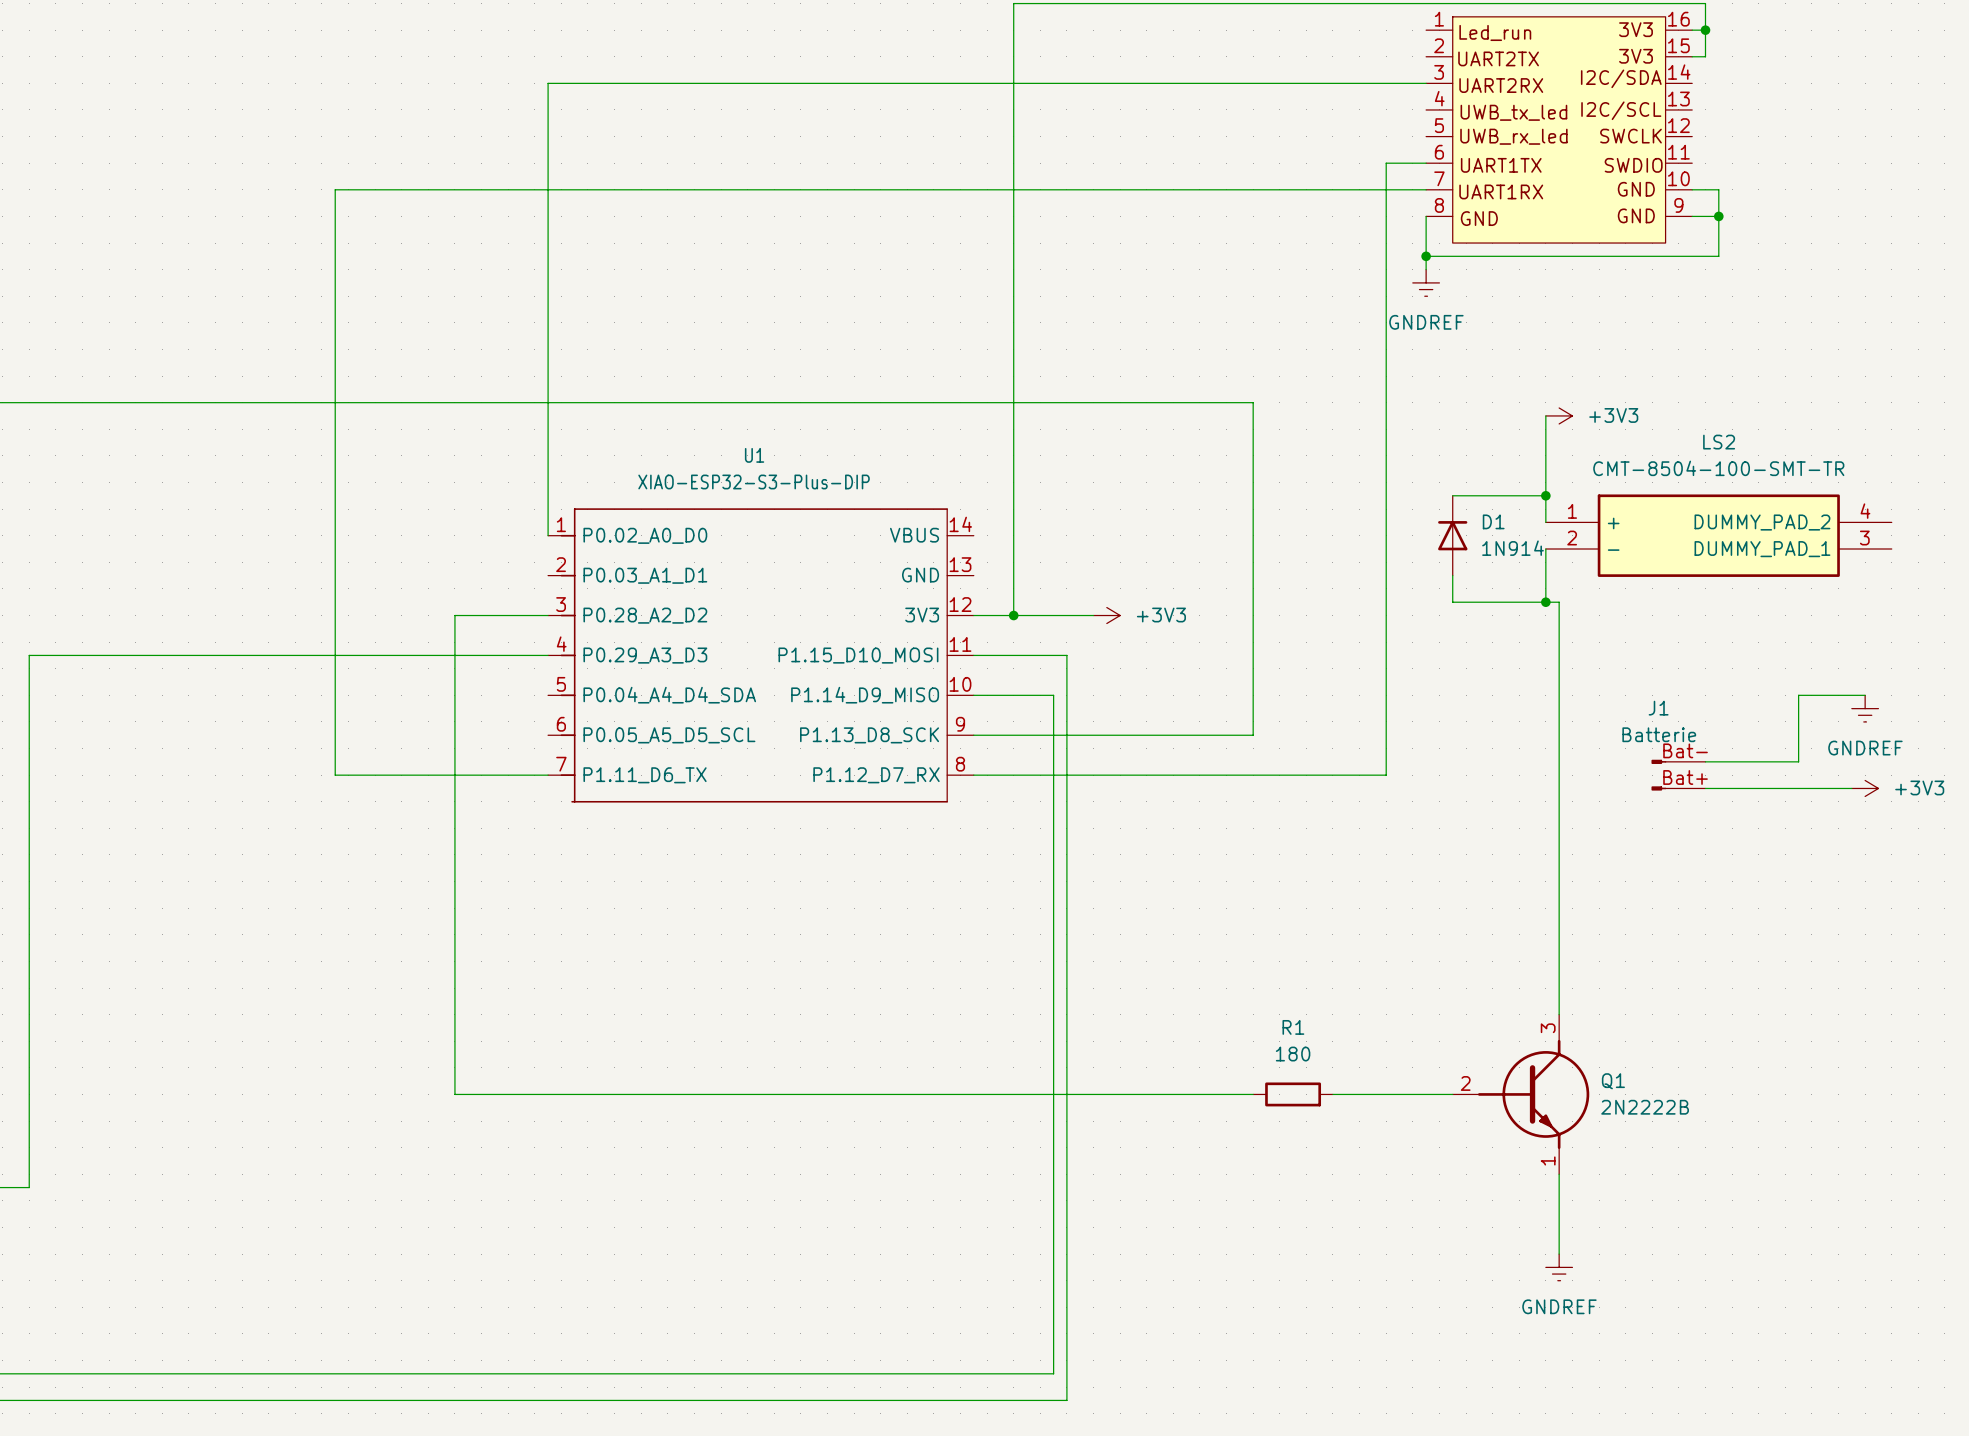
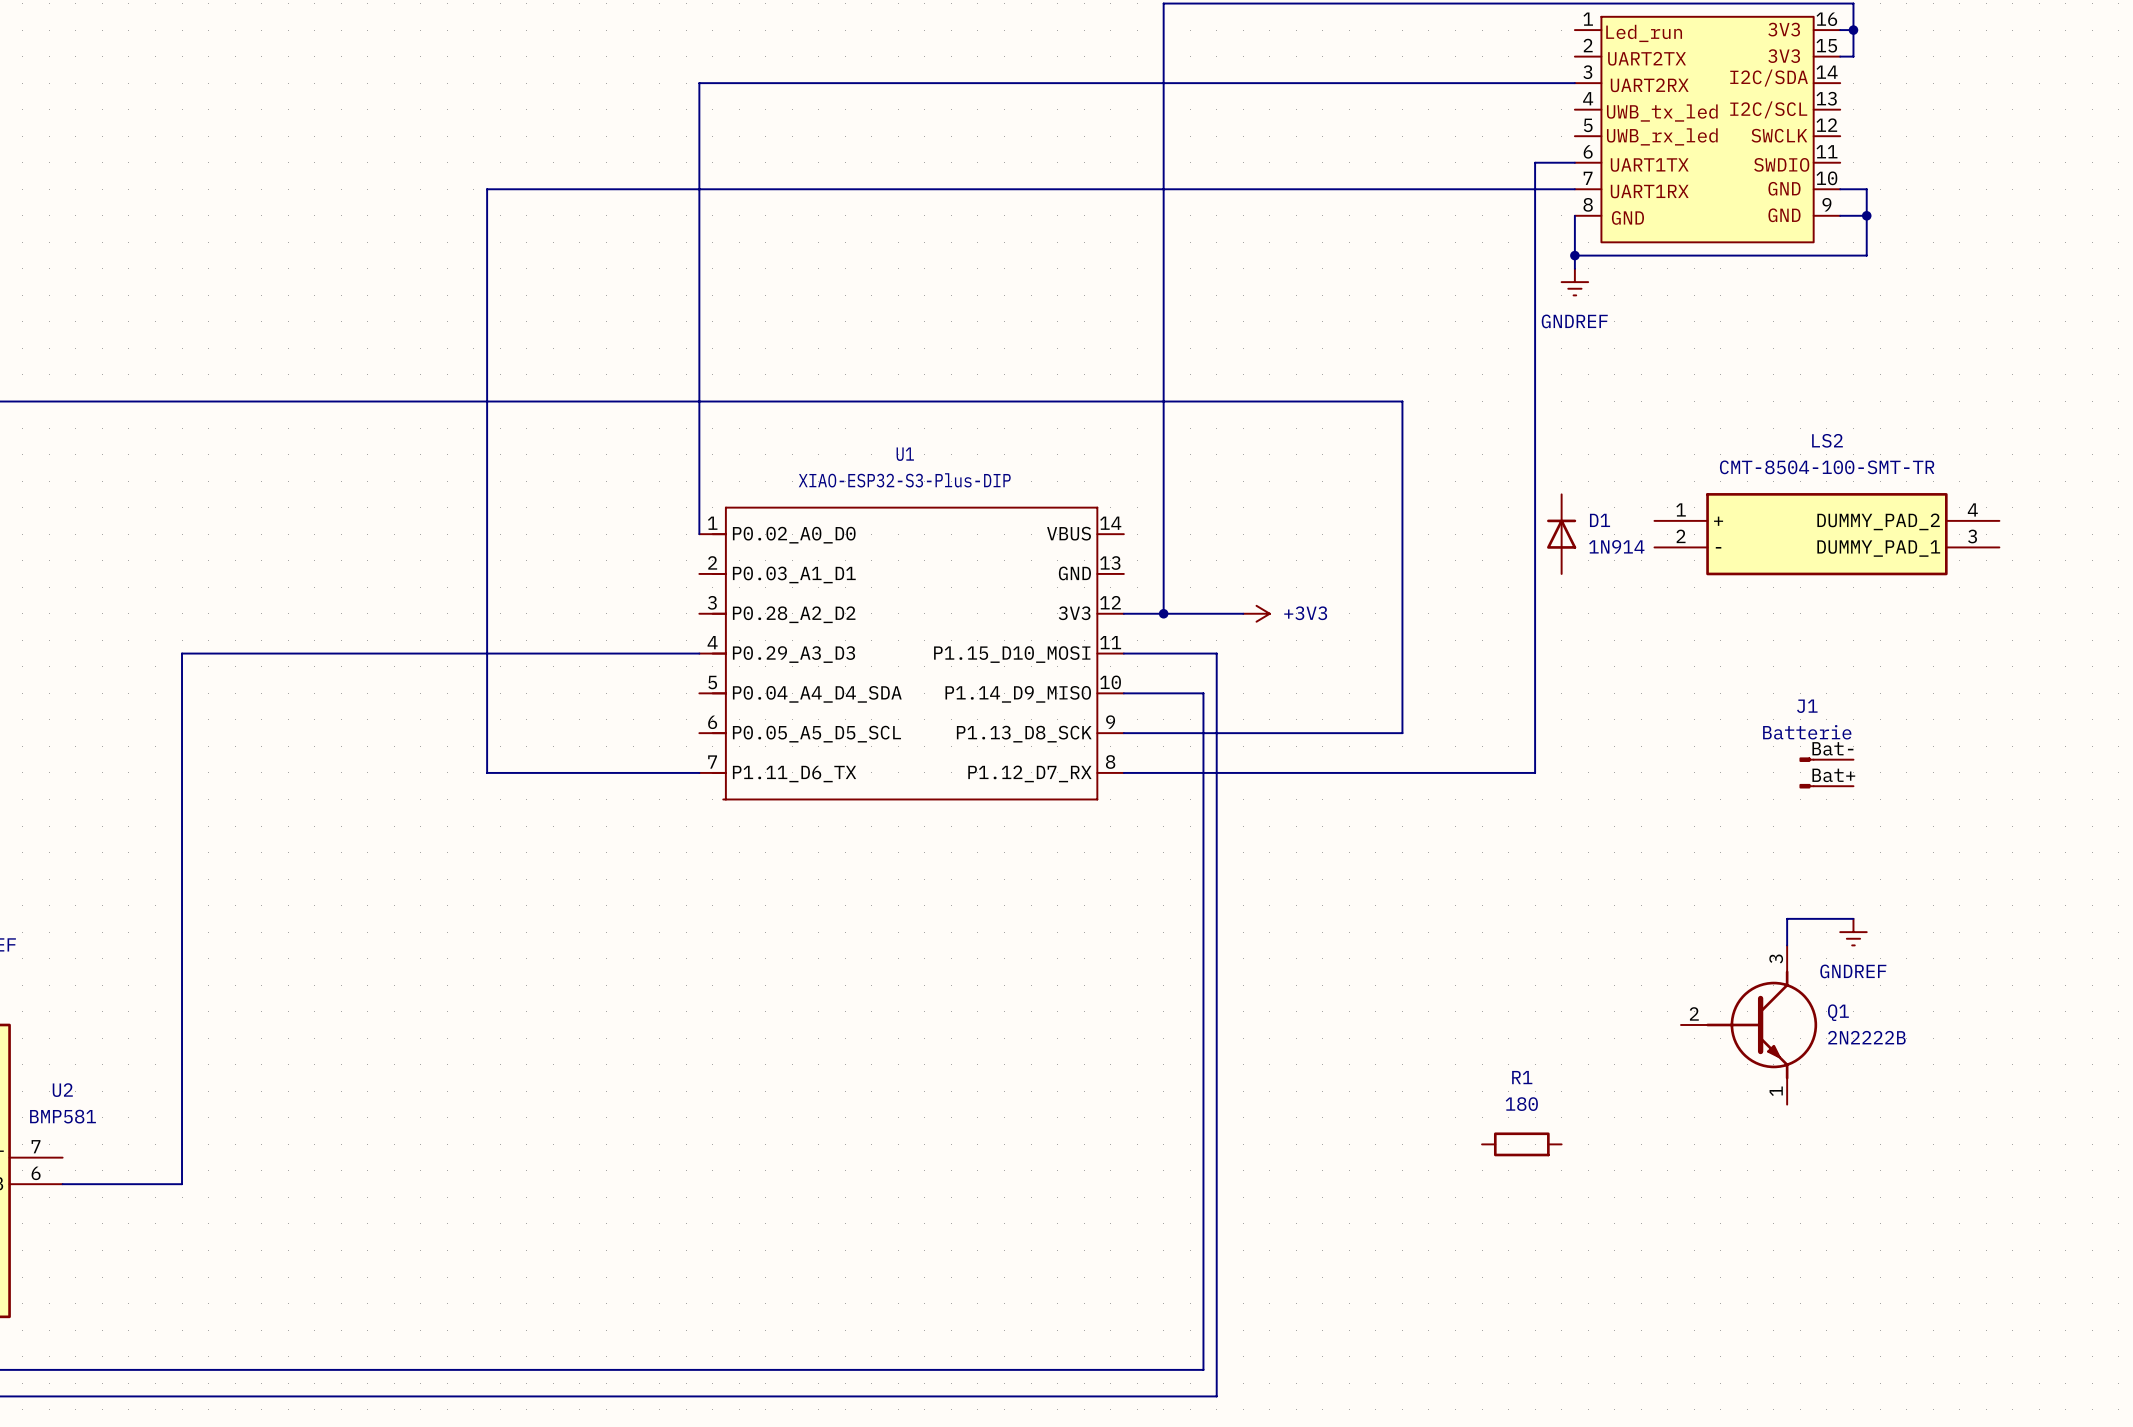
wire: (1545, 415) (1545, 522) -> none
power symbol: +3V3 (1559, 415) -> none
wire: (1452, 495) (1545, 495) -> none
junction: (1545, 495) -> none
D1 position: (1452, 535) -> (1561, 534)
LS2 position: (1718, 535) -> (1826, 534)
wire: (1545, 549) (1545, 602) -> none
wire: (1452, 575) (1452, 602) (1559, 602) (1559, 1014) -> none
junction: (1545, 602) -> none
wire: (548, 615) (454, 615) (454, 1094) (1253, 1094) -> none
wire: (1865, 695) (1798, 695) (1798, 761) (1705, 761) -> none
power symbol: GNDREF (1865, 708) -> none
wire: (1705, 788) (1851, 788) -> none
power symbol: +3V3 (1865, 788) -> none
wire: none -> (1853, 918) (1787, 918) (1787, 945)
power symbol: none -> GNDREF (1853, 932)
R1 position: (1293, 1094) -> (1521, 1144)
wire: (1332, 1094) (1452, 1094) -> none
Q1 position: (1520, 1094) -> (1749, 1024)
wire: (1559, 1174) (1559, 1254) -> none
power symbol: GNDREF (1559, 1267) -> none

